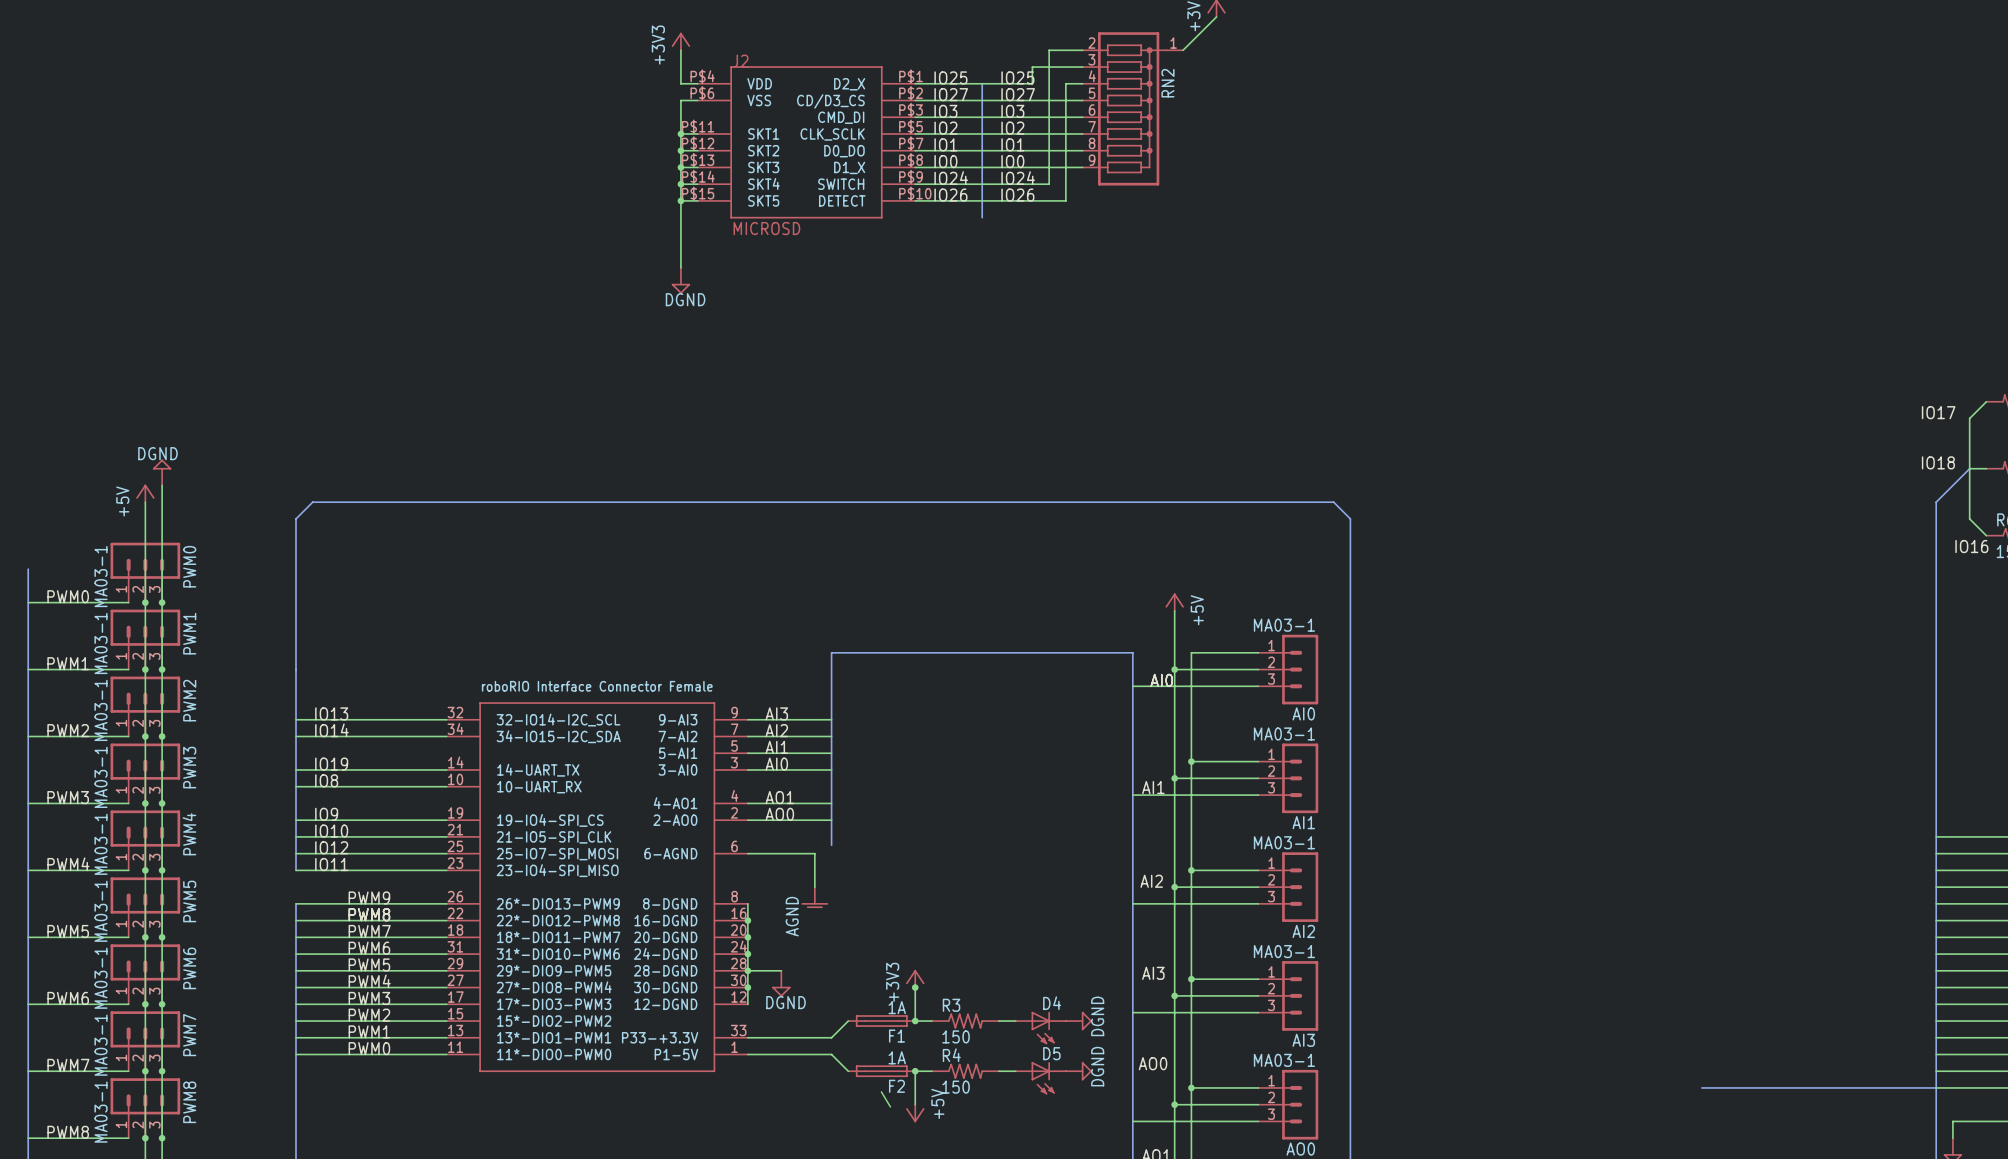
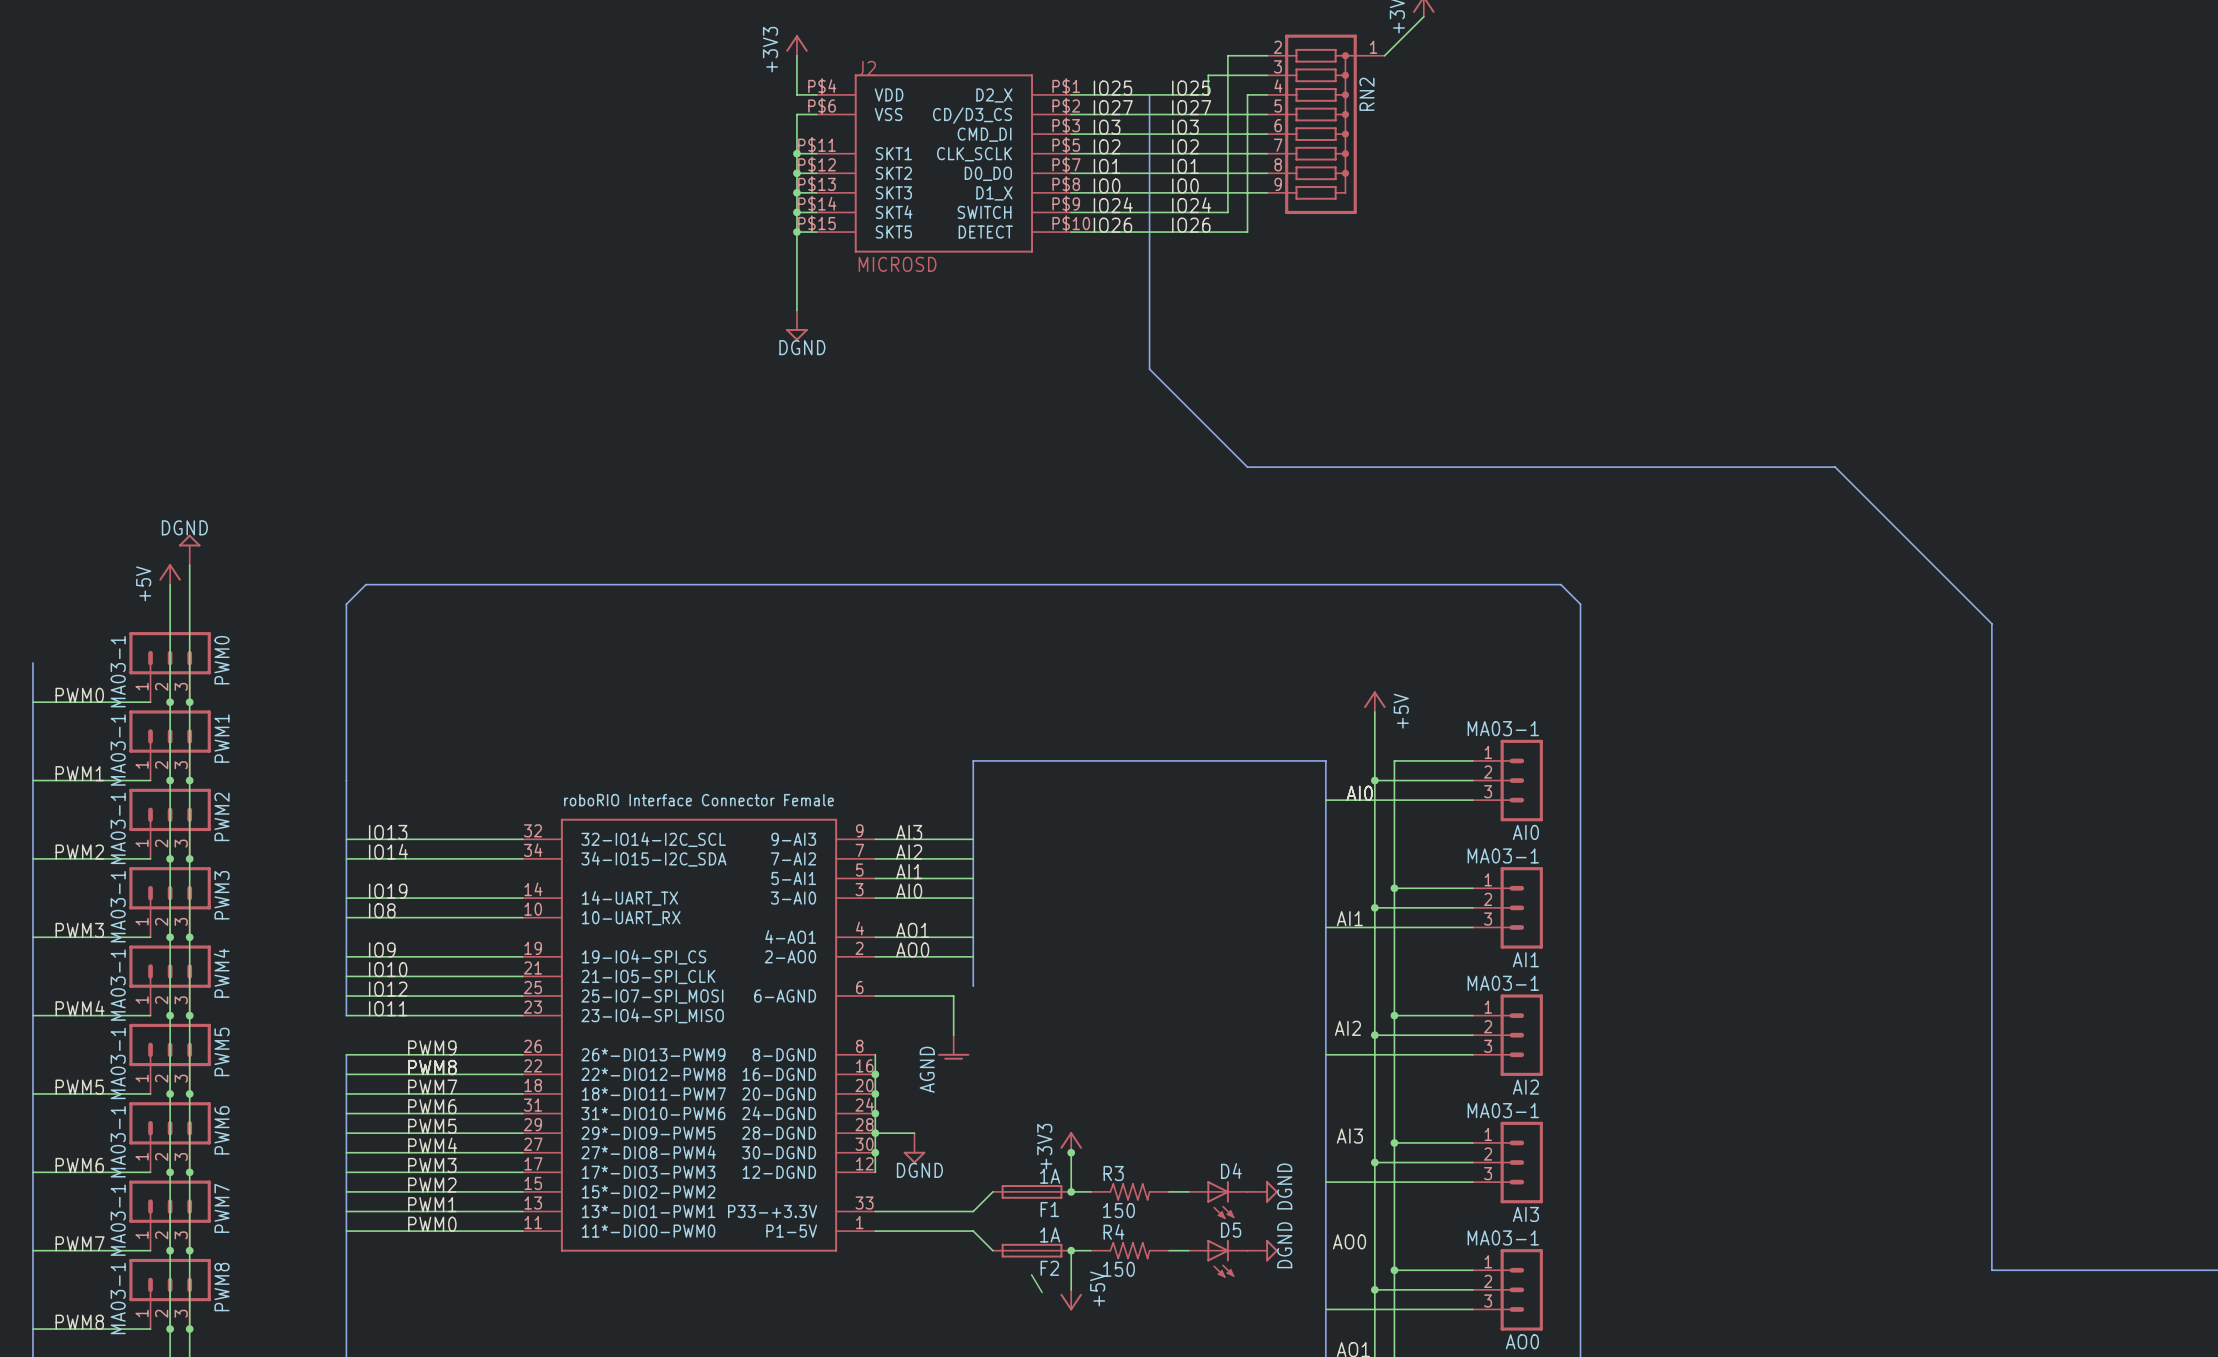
bus: none -> (1149, 251) (1149, 369) (1247, 467) (1835, 467) (1991, 623) (1991, 1270)

